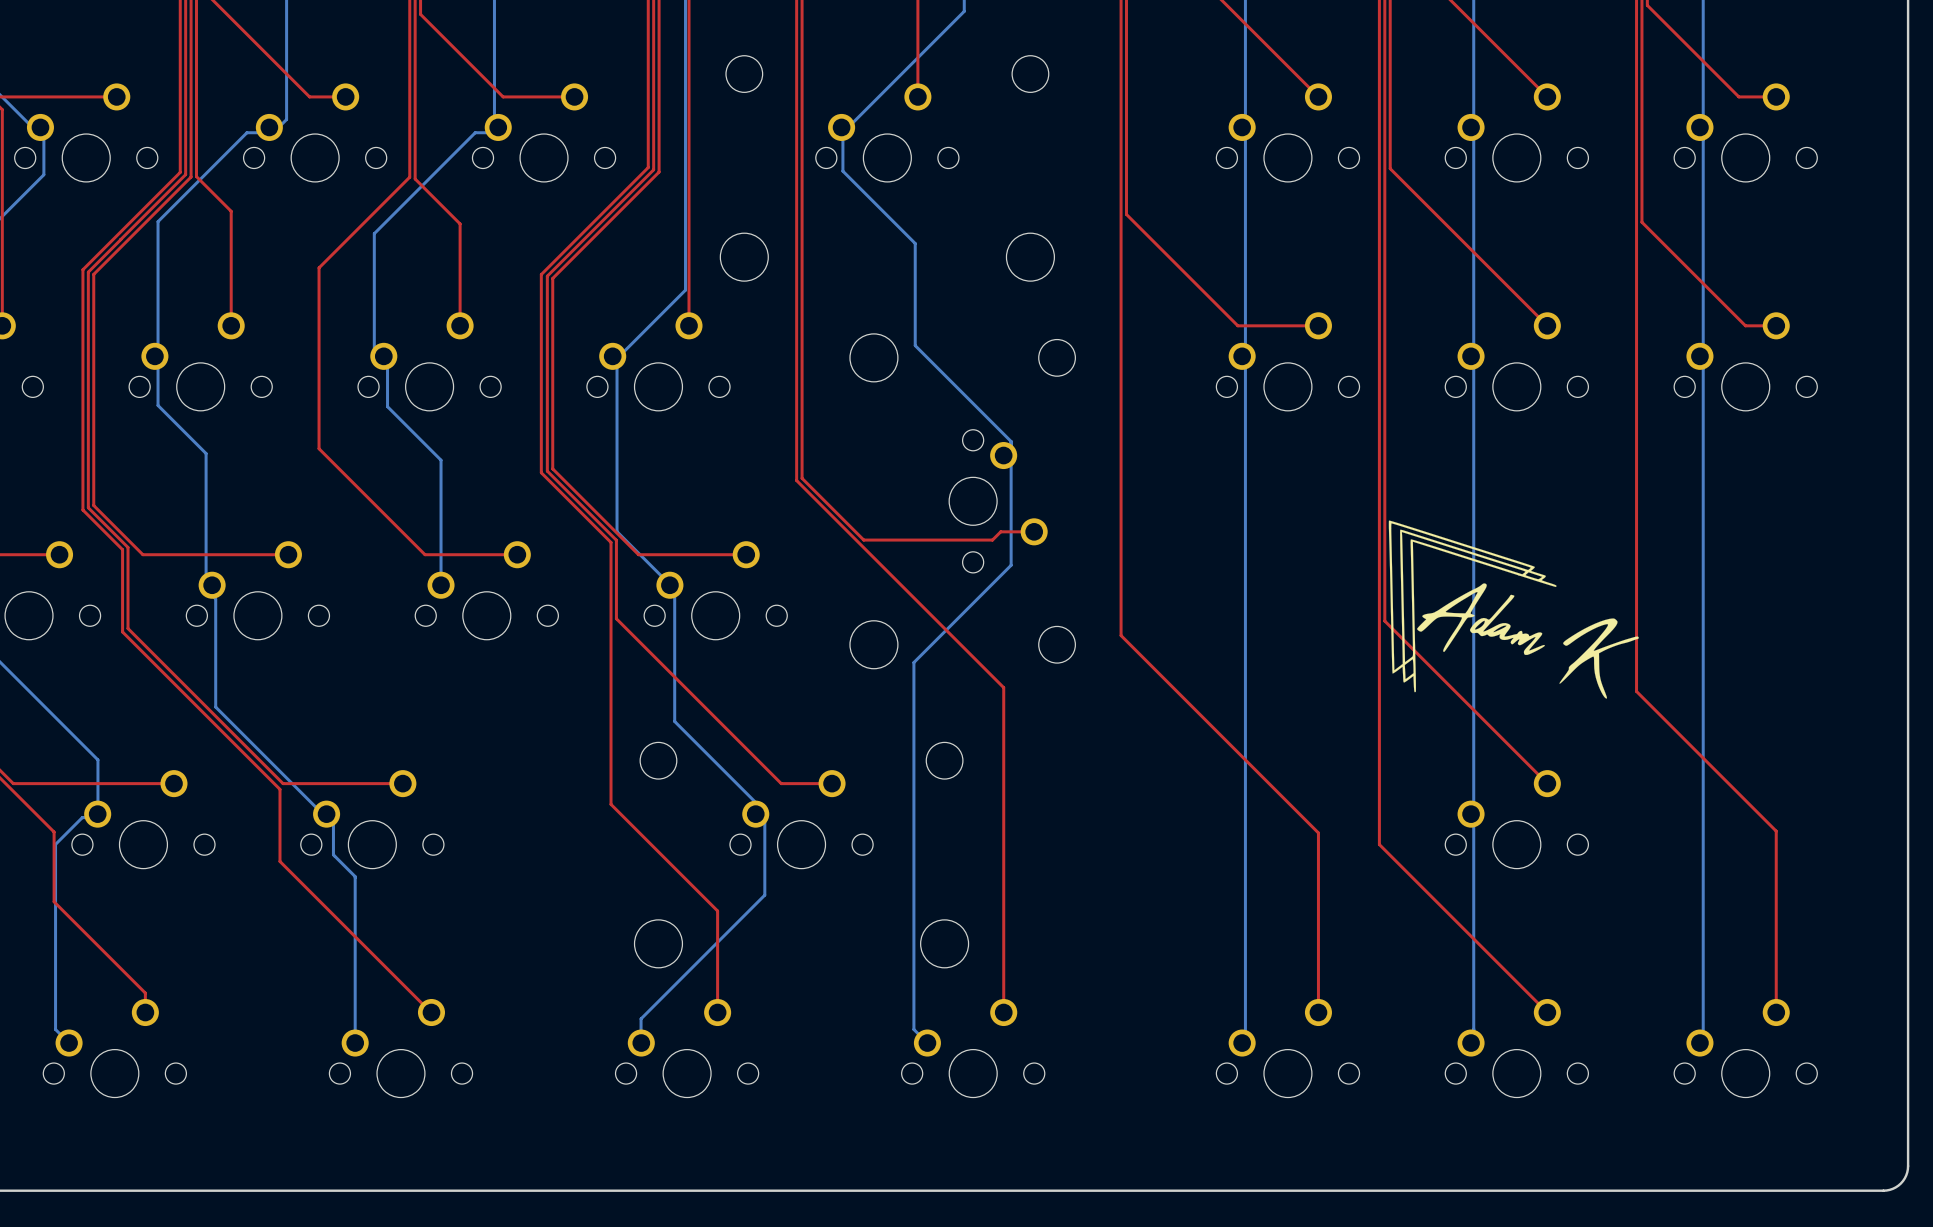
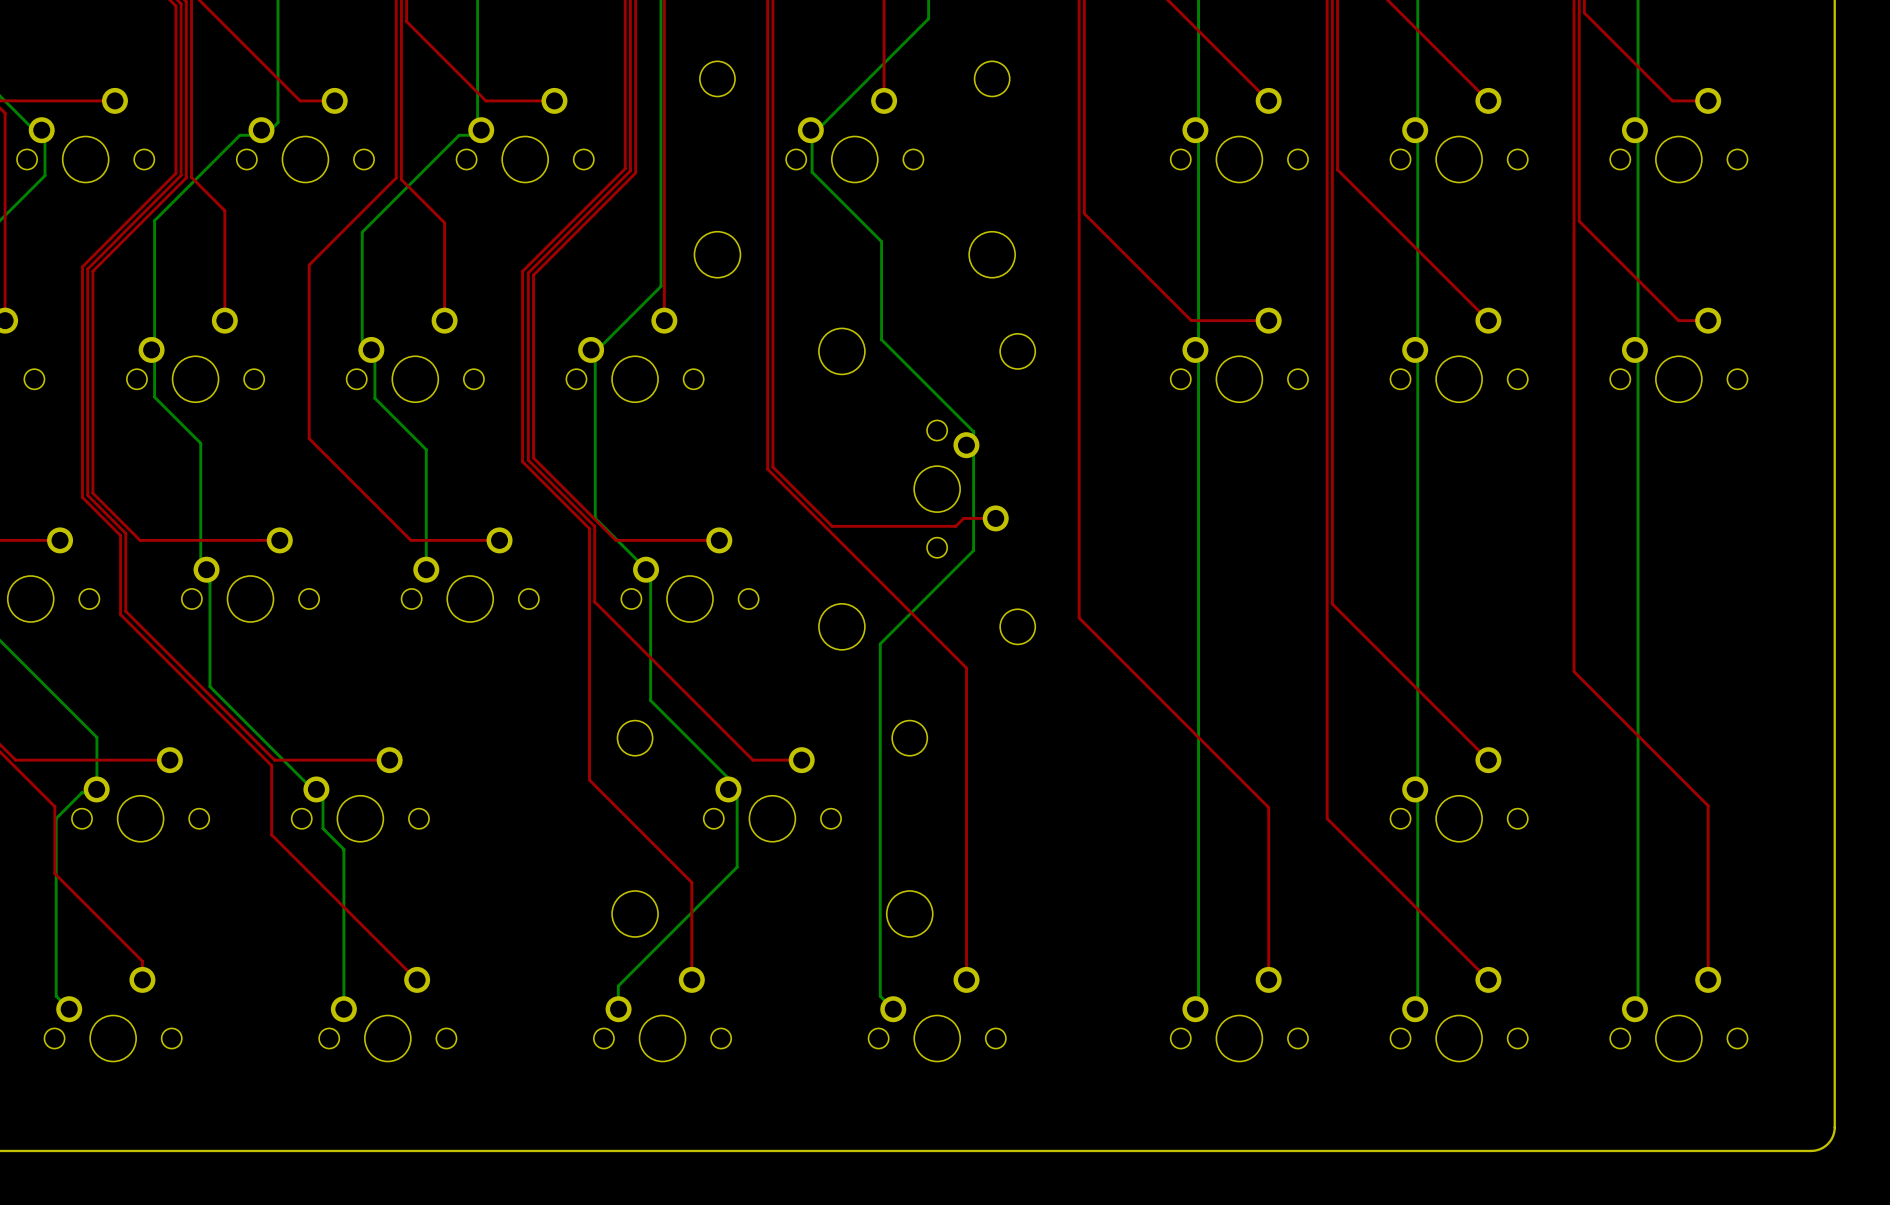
drawing: [1388, 520, 1639, 699] -> none

